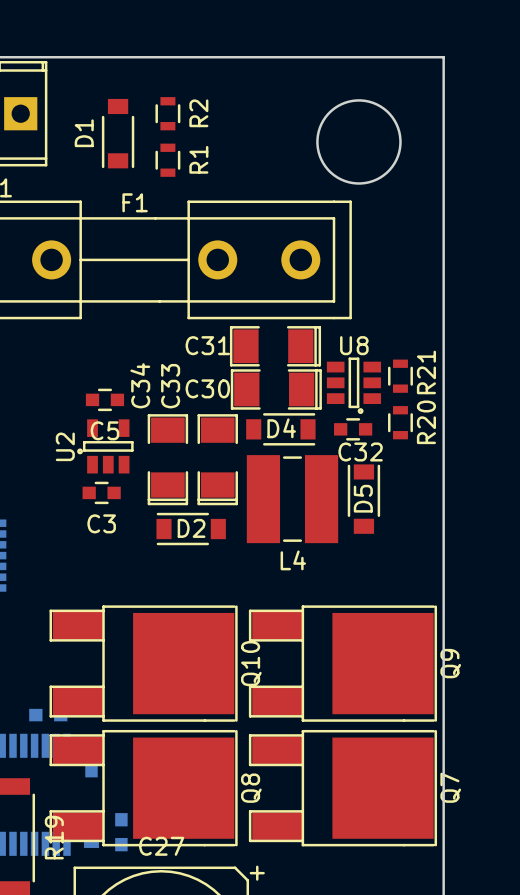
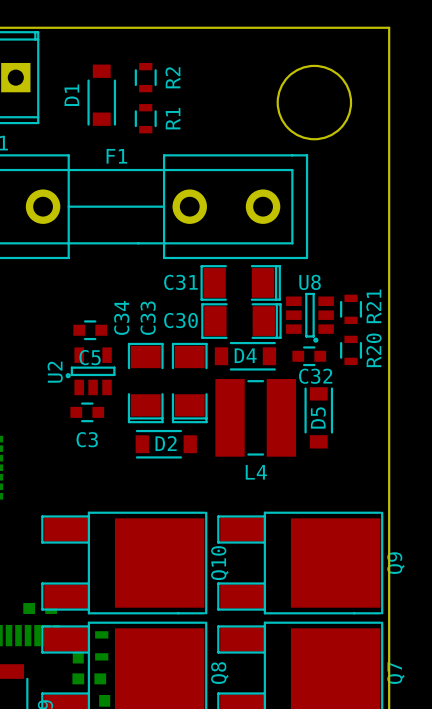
part: none -> (101, 645)
part: none -> (89, 678)

